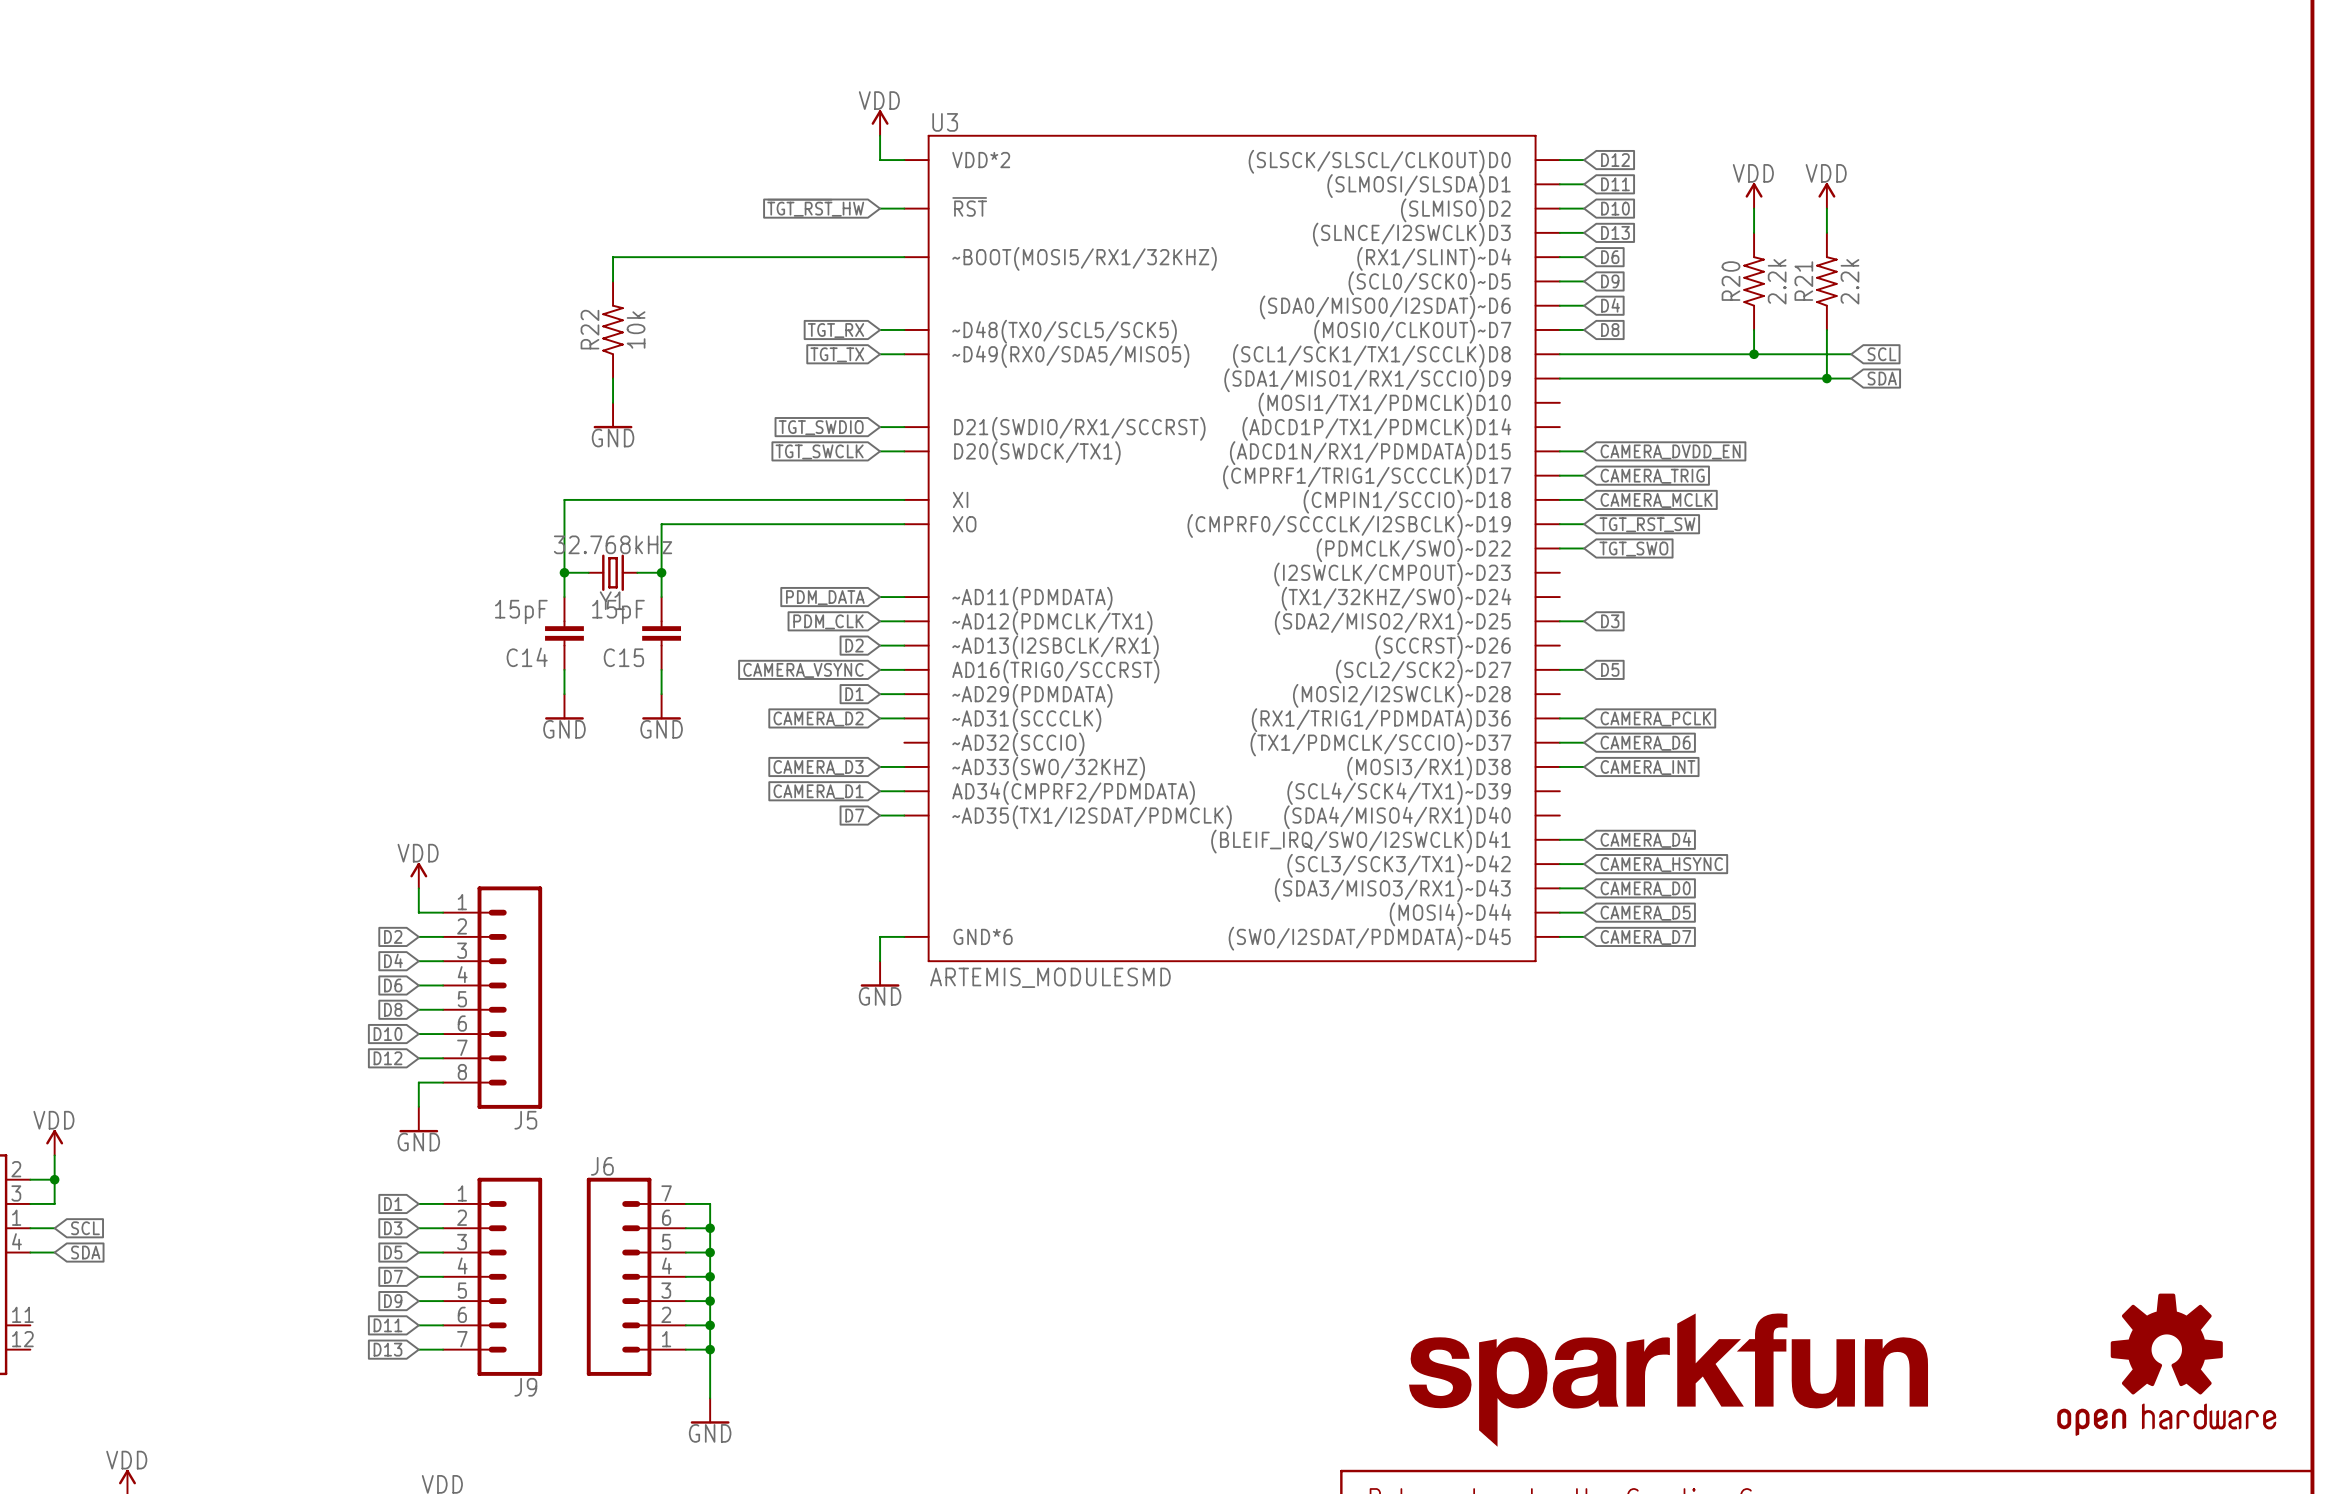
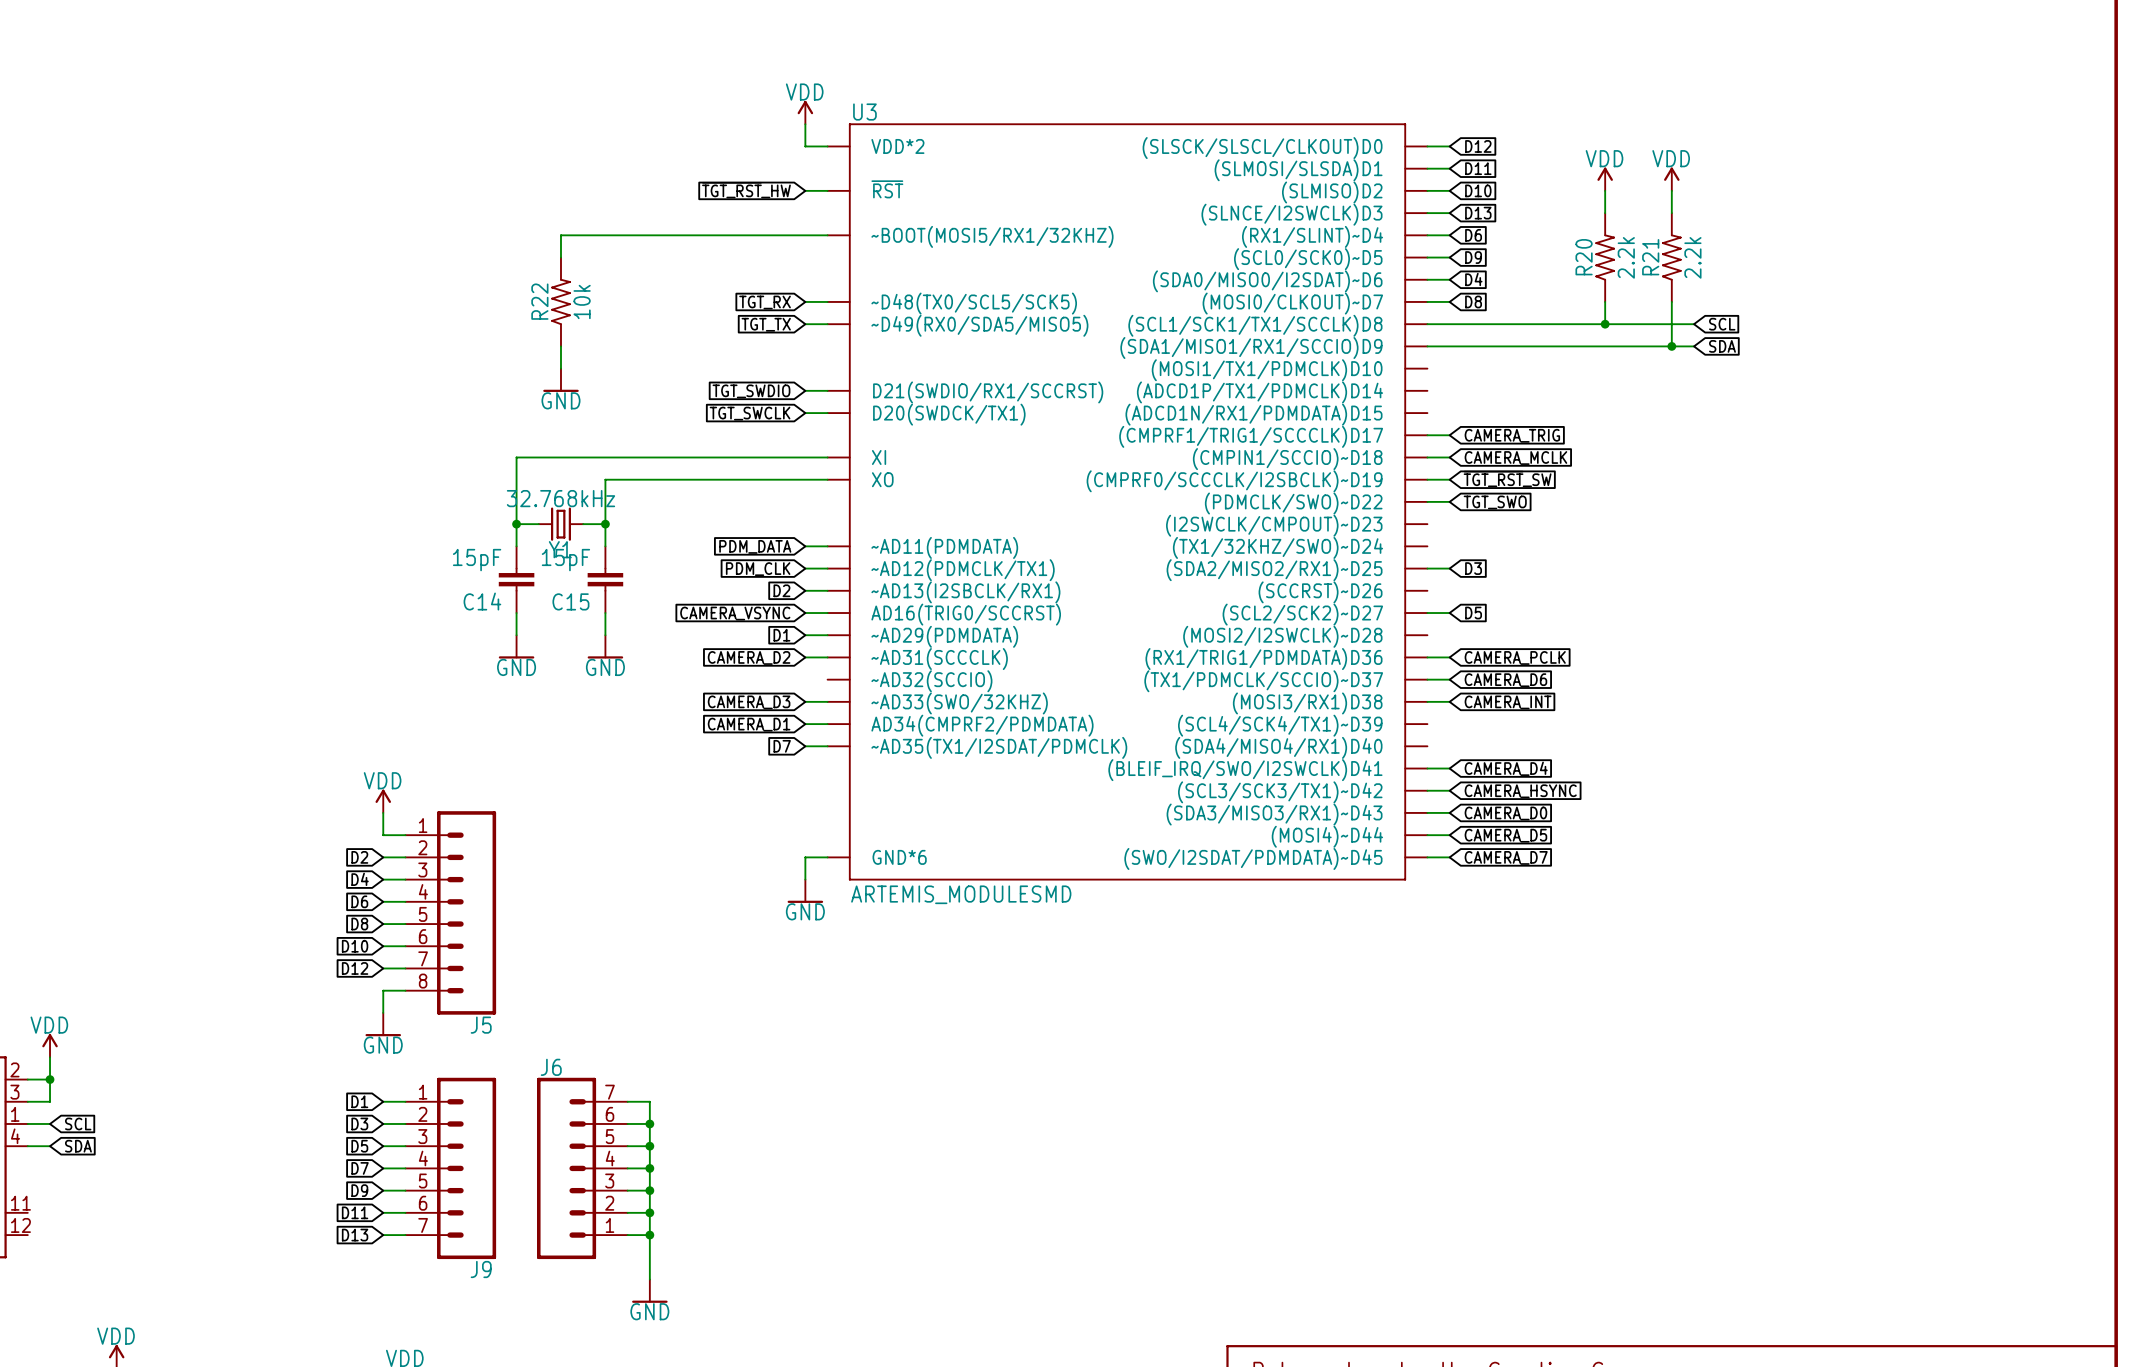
wire: (1559, 451) (1584, 451) -> none
global label: CAMERA_DVDD_EN (1670, 451) -> none
part: (2166, 1364) -> none
part: (1668, 1380) -> none

